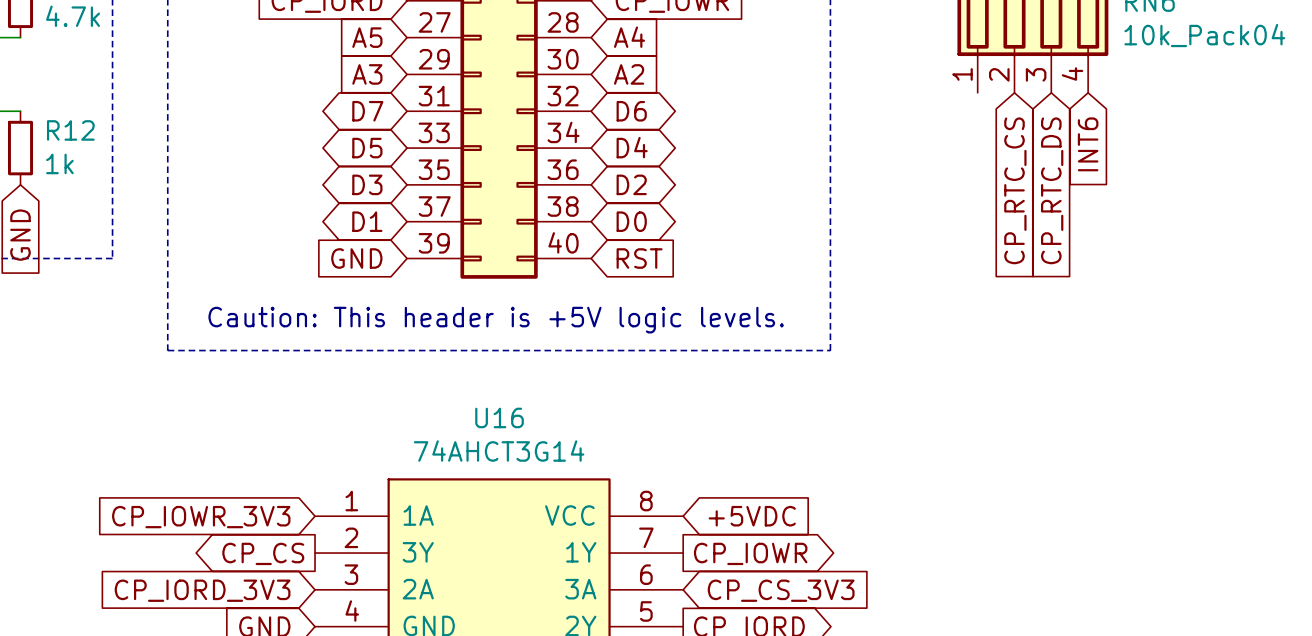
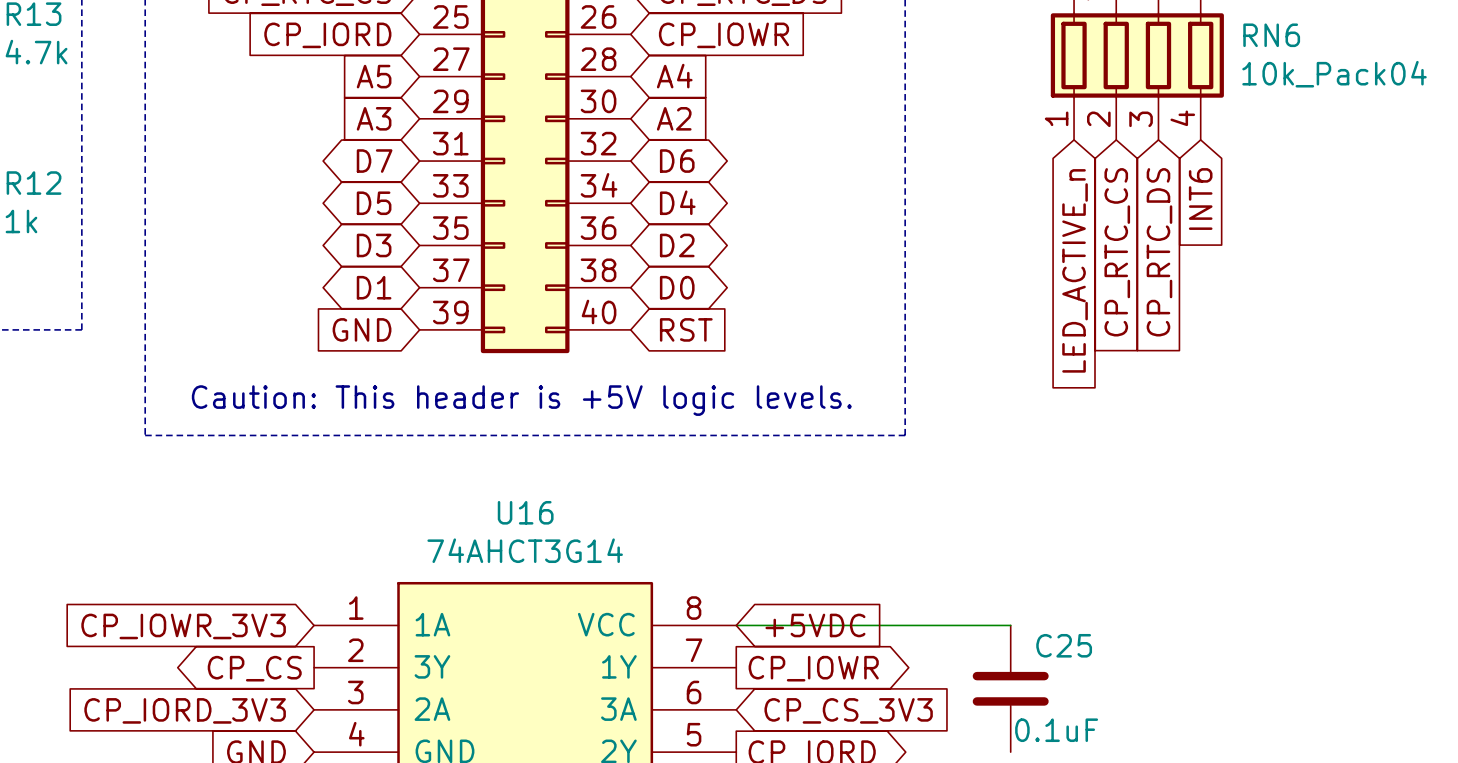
global label: none -> LED_ACTIVE_n (1075, 270)
wire: none -> (736, 625) (1010, 625)
C25: none -> 0.1uF (1010, 688)

